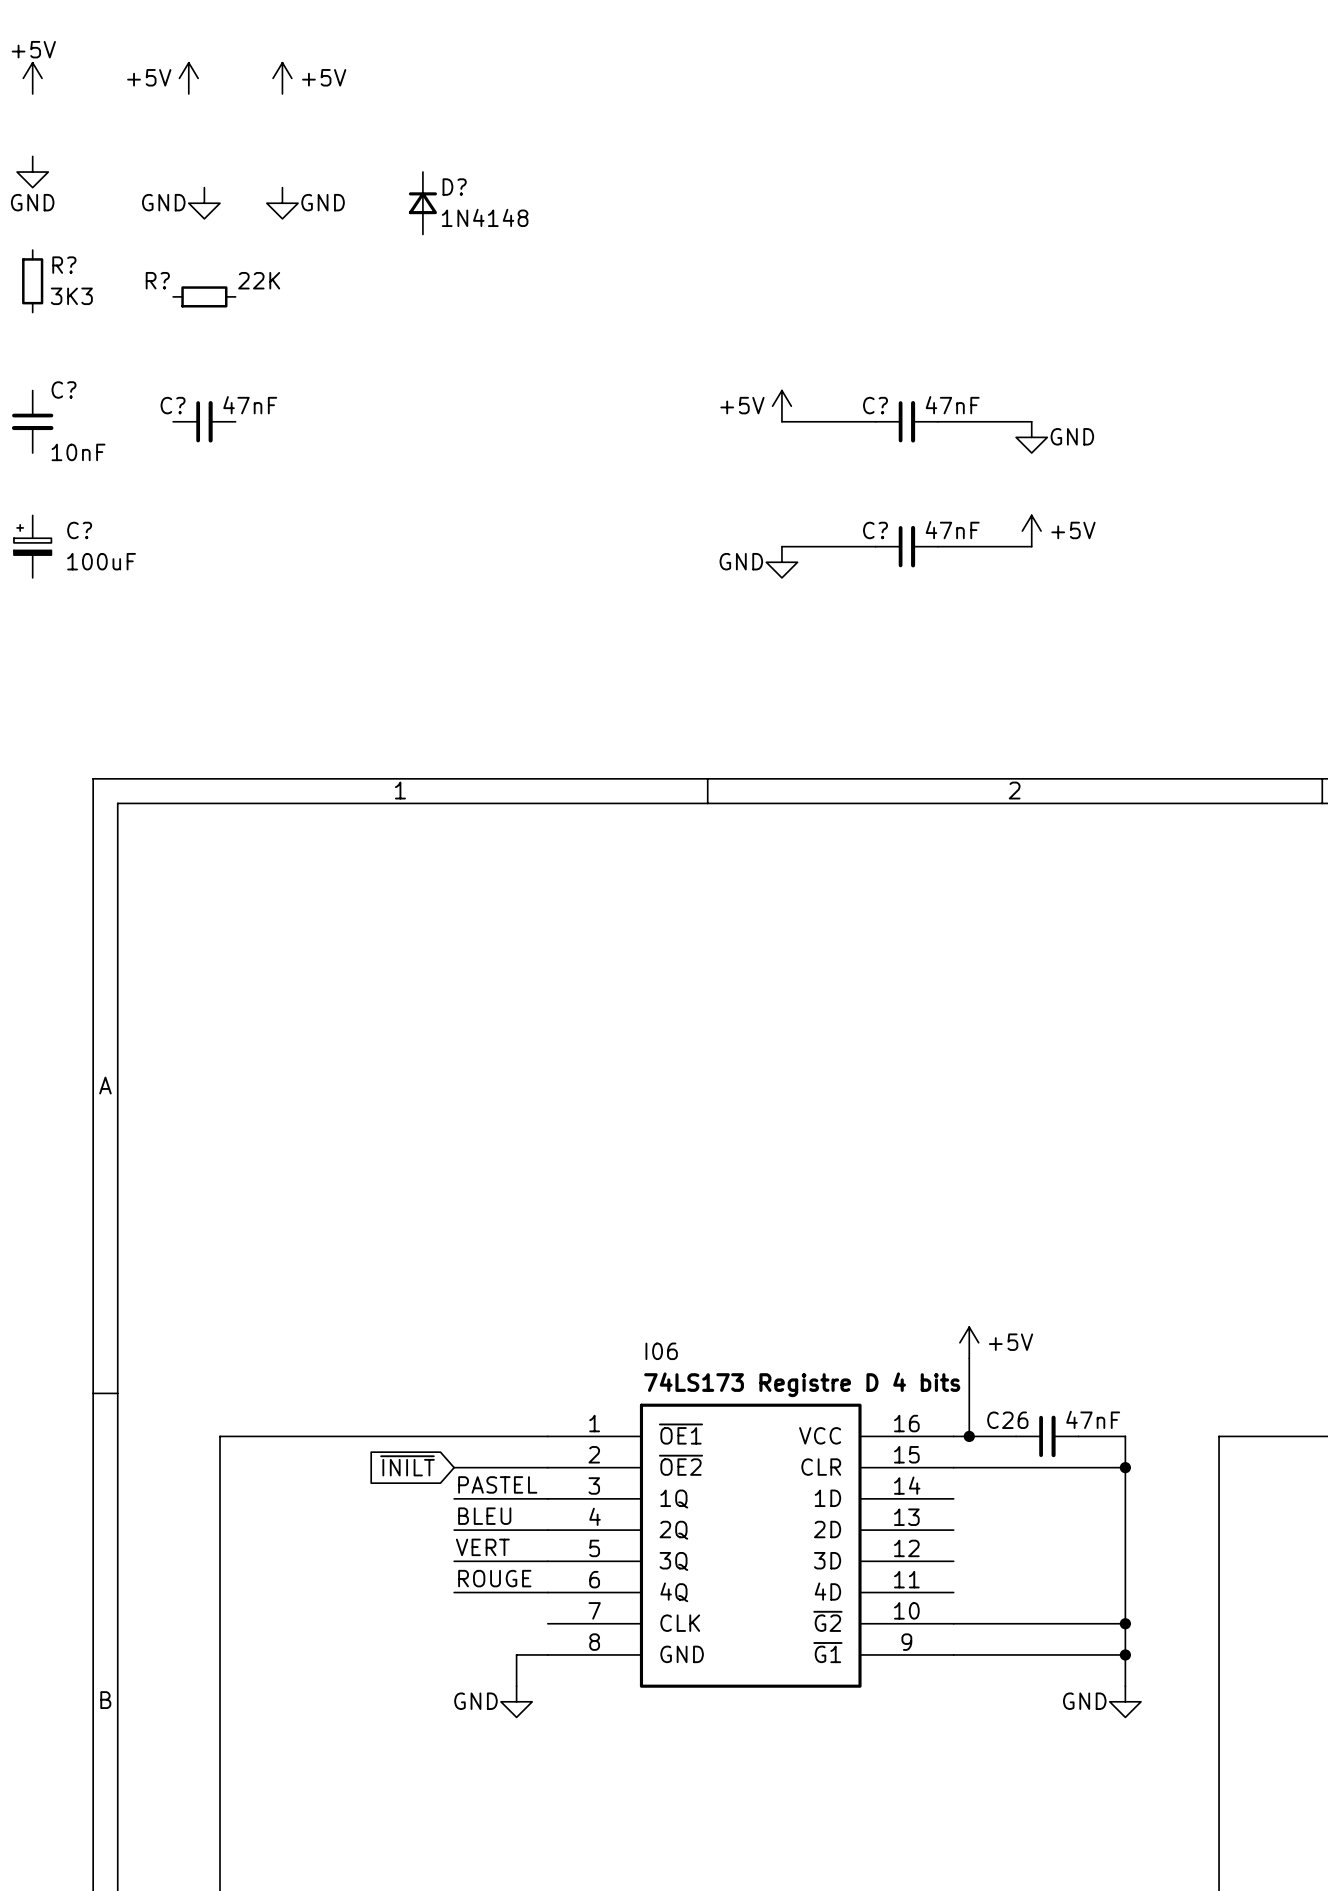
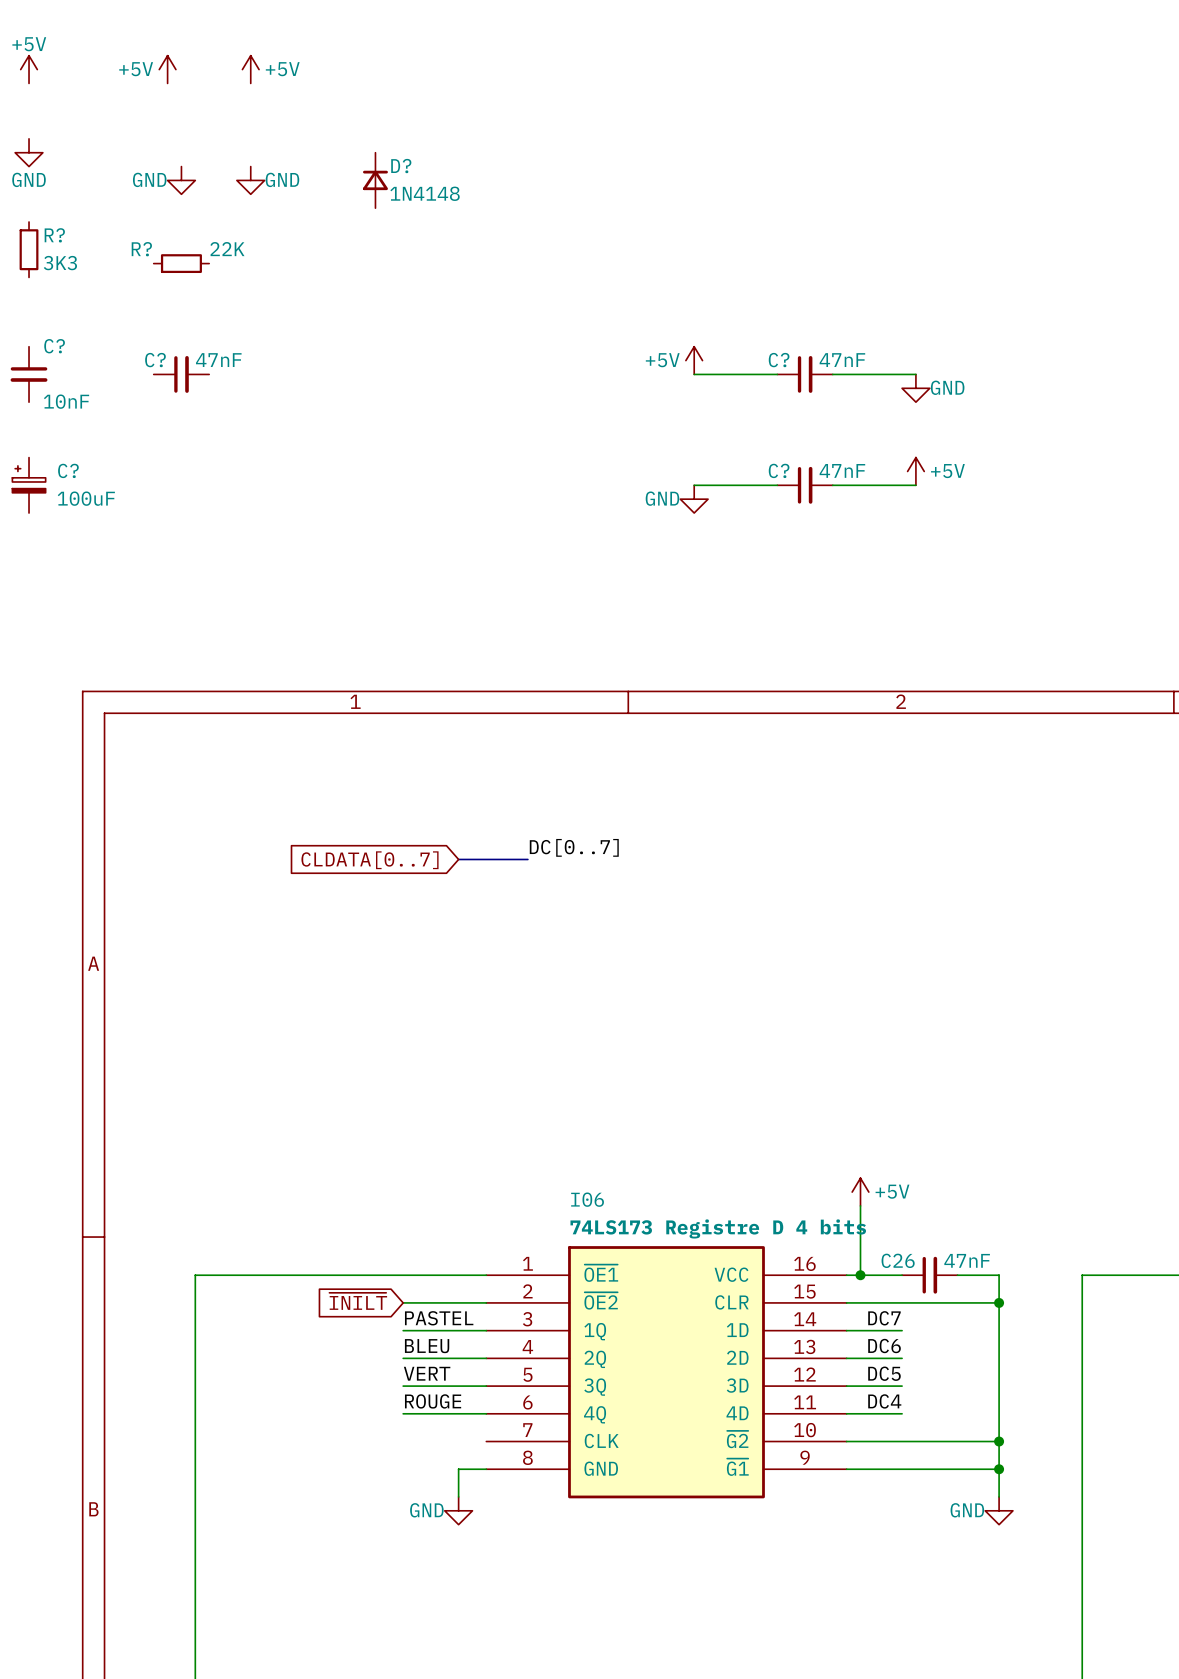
label: none -> DC[0..7] (574, 847)
bus: none -> (458, 859) (527, 859)
global label: none -> CLDATA[0..7] (370, 860)
label: none -> DC7 (884, 1318)
wire: none -> (846, 1330) (902, 1330)
label: none -> DC6 (884, 1346)
wire: none -> (846, 1358) (902, 1358)
label: none -> DC5 (884, 1373)
wire: none -> (846, 1386) (902, 1386)
label: none -> DC4 (884, 1401)
wire: none -> (846, 1413) (902, 1413)

